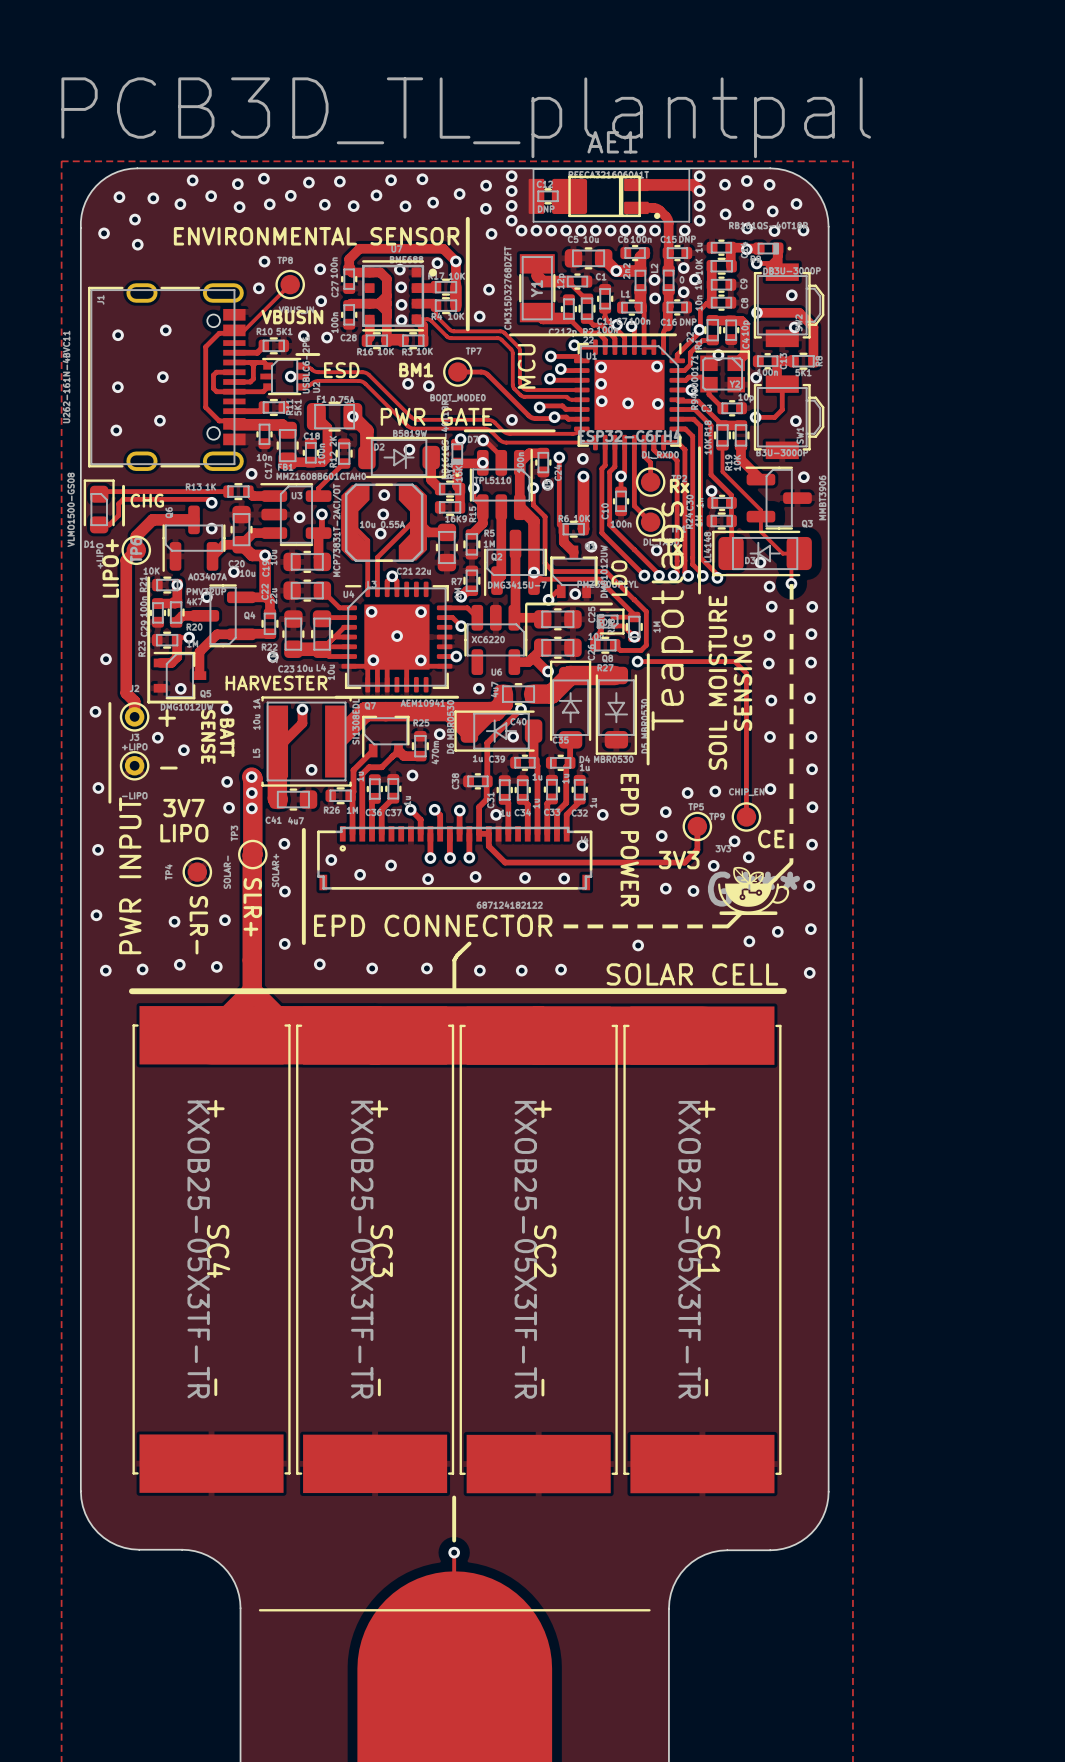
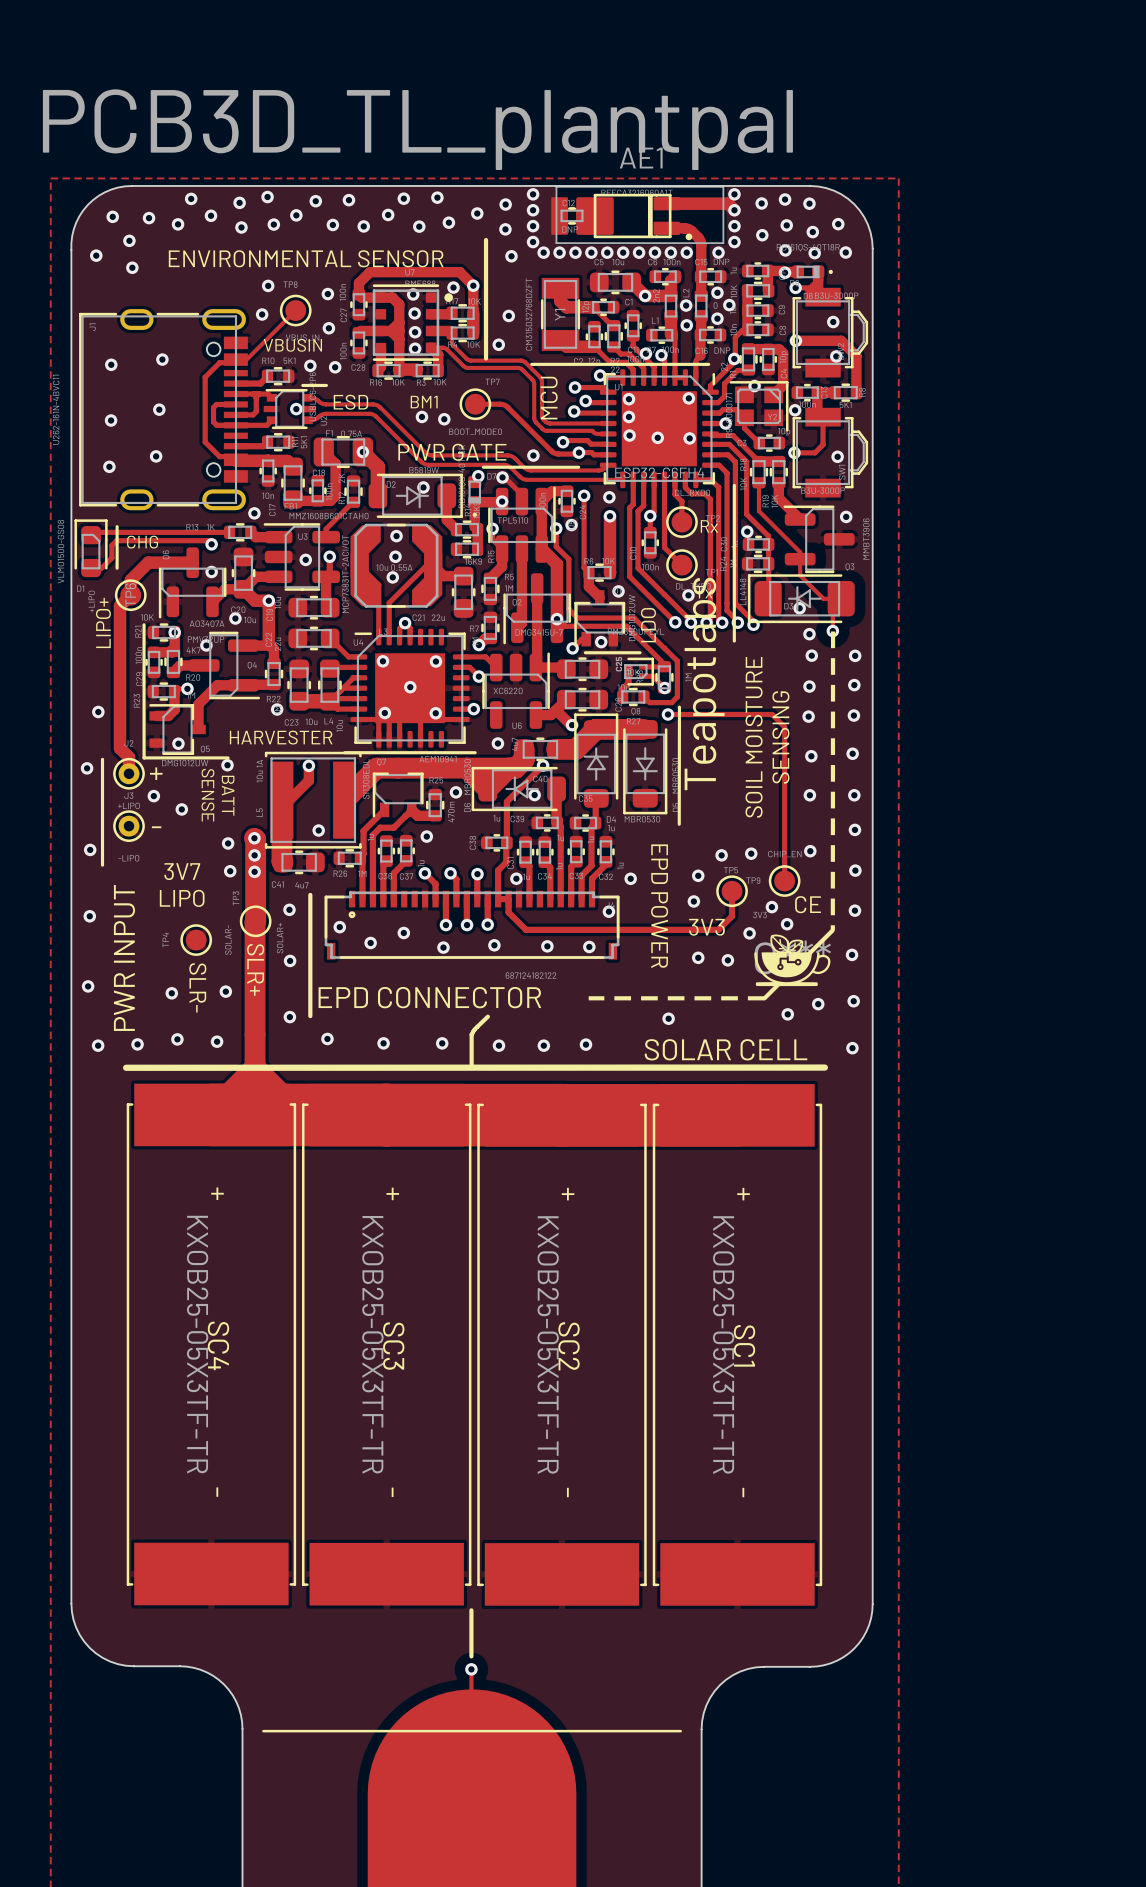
line: (526, 603) (560, 603) -> none

